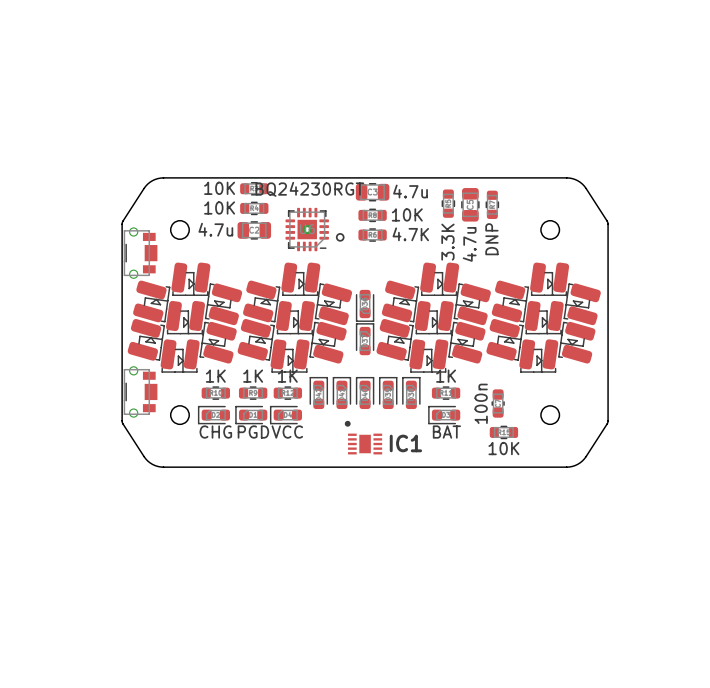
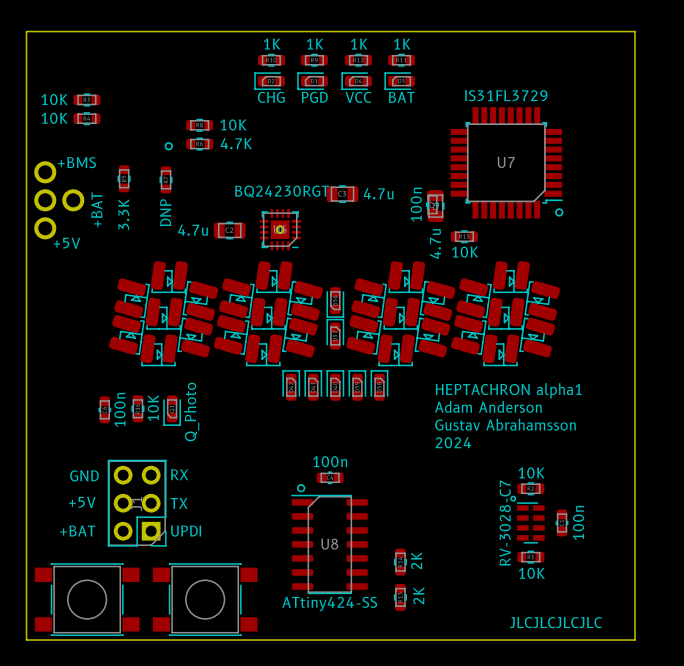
board edge: none -> (26, 31) (635, 31) (635, 640) (26, 640) (26, 31)
drawing: none -> [164, 142, 173, 151]
text: none -> +BMS (77, 162)
U7: none -> IS31FL3729 (506, 162)
board edge: (163, 177) (566, 177) (577, 180) (586, 188) (608, 223) (607, 423) (584, 458) (577, 464) (569, 466) (163, 467) (152, 464) (144, 456) (122, 421) (122, 224) (145, 186) (152, 180) (163, 177) -> none
part position: (254, 188) -> (86, 99)
part: none -> (59, 200)
text: none -> +BAT (96, 209)
part position: (448, 203) -> (124, 178)
part position: (492, 204) -> (166, 179)
drawing: none -> [555, 208, 564, 217]
part position: (254, 208) -> (86, 118)
part position: (372, 215) -> (199, 125)
round board edge: [170, 220, 190, 240] -> none
round board edge: [540, 220, 561, 240] -> none
drawing: [335, 233, 345, 242] -> none
part position: (372, 235) -> (199, 144)
text: none -> +5V (66, 243)
part: (140, 253) -> none
part: (140, 391) -> none
part position: (215, 393) -> (271, 60)
part position: (253, 393) -> (314, 60)
part position: (287, 393) -> (358, 60)
part position: (446, 393) -> (401, 60)
text: none -> HEPTACHRON alpha1 (508, 390)
part position: (498, 403) -> (432, 204)
round board edge: [170, 405, 190, 425] -> none
round board edge: [540, 405, 561, 425] -> none
part position: (213, 415) -> (269, 81)
part position: (251, 415) -> (312, 81)
part position: (286, 415) -> (356, 81)
part position: (444, 415) -> (399, 81)
text: none -> Adam Anderson (488, 406)
part: none -> 10K (137, 408)
part: none -> 100n (104, 409)
part: none -> Q_Photo (172, 410)
part position: (503, 432) -> (464, 236)
text: none -> Gustav Abrahamsson (505, 424)
IC1: (363, 437) -> none
text: none -> 2024 (453, 442)
text: none -> RX (179, 474)
text: none -> GND (84, 475)
part: none -> 100n (330, 477)
drawing: none -> [297, 484, 306, 493]
part: none -> 10K (530, 488)
text: none -> +5V (82, 502)
J1: none -> (137, 503)
text: none -> TX (179, 503)
part: none -> RV-3028-C7 (527, 519)
part: none -> 100n (562, 522)
text: none -> +BAT (77, 530)
text: none -> UPDI (186, 531)
U8: none -> ATtiny424-SS (329, 544)
part: none -> 10K (530, 557)
part: none -> 2K (400, 562)
part: none -> 2K (400, 597)
part: none -> (87, 599)
part: none -> (205, 599)
text: none -> JLCJLCJLCJLC (555, 622)

